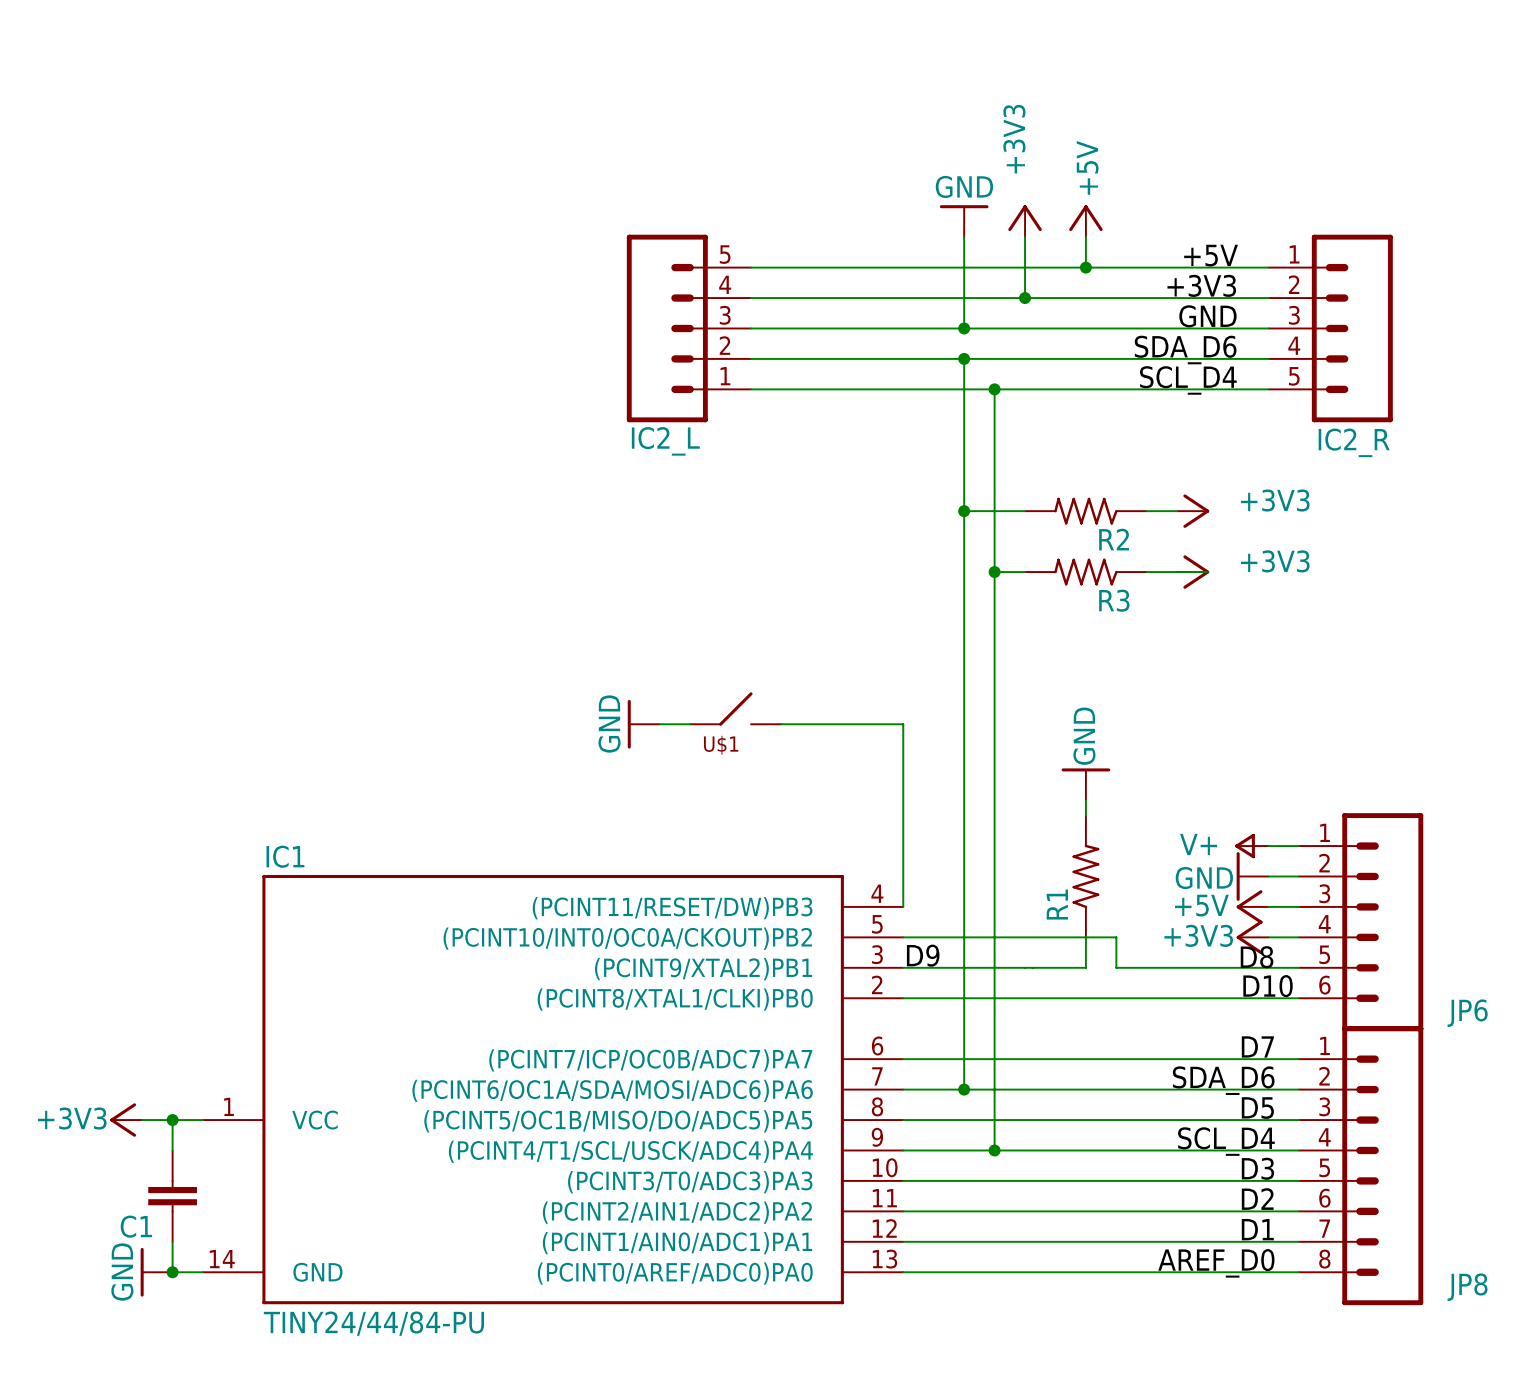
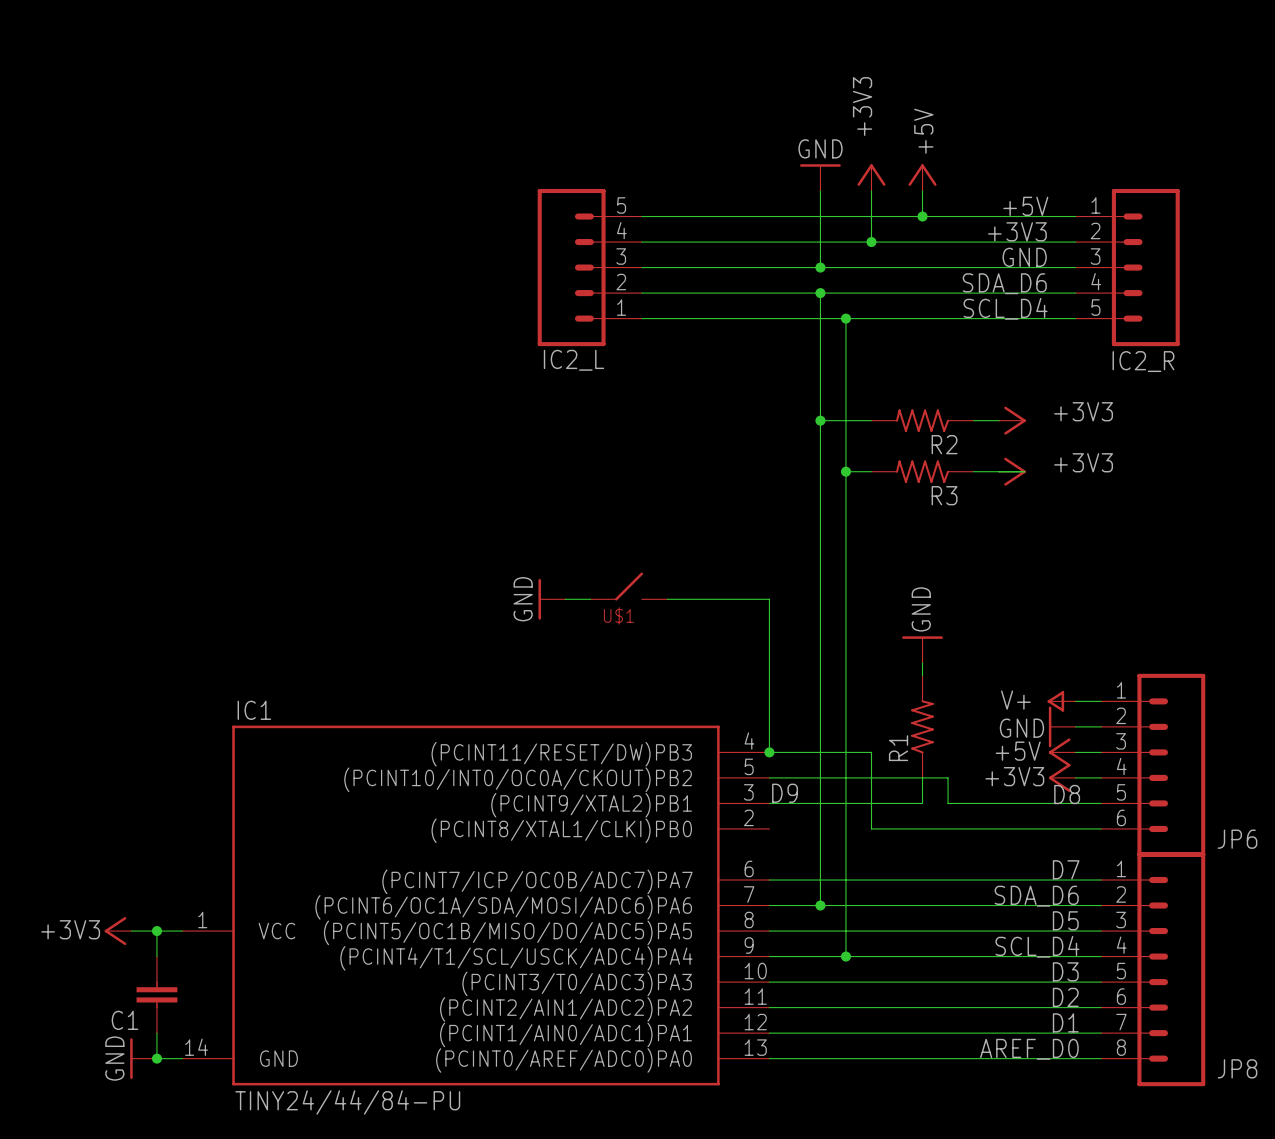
junction: none -> (769, 752)
label: D10 (1268, 986) -> none
wire: (903, 998) (1025, 998) -> (769, 752) (871, 752) (871, 828)

